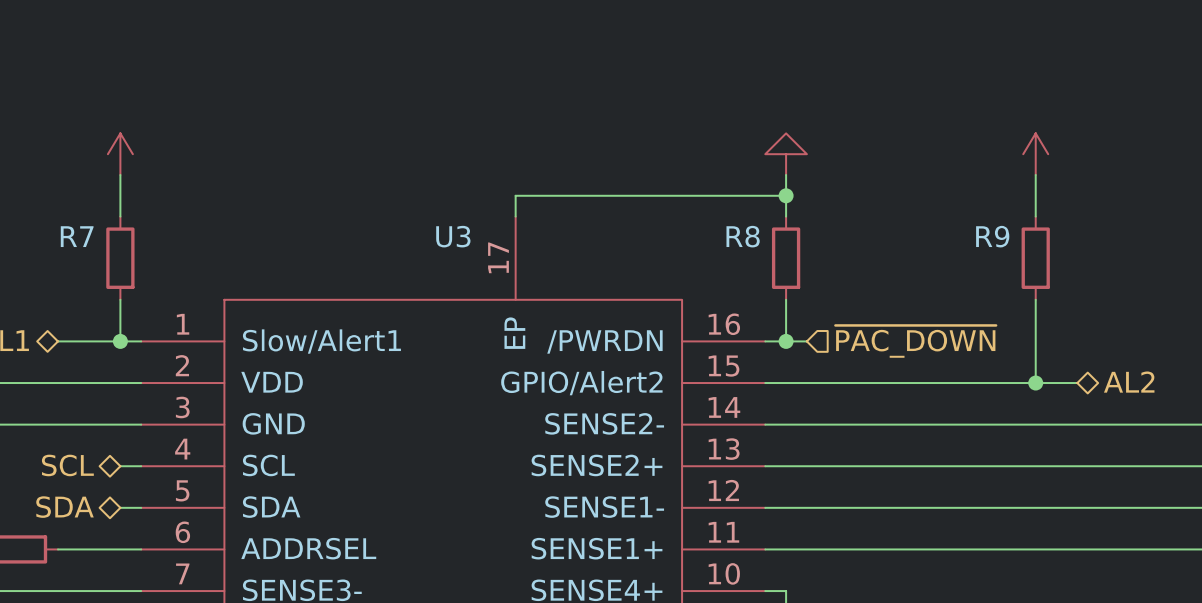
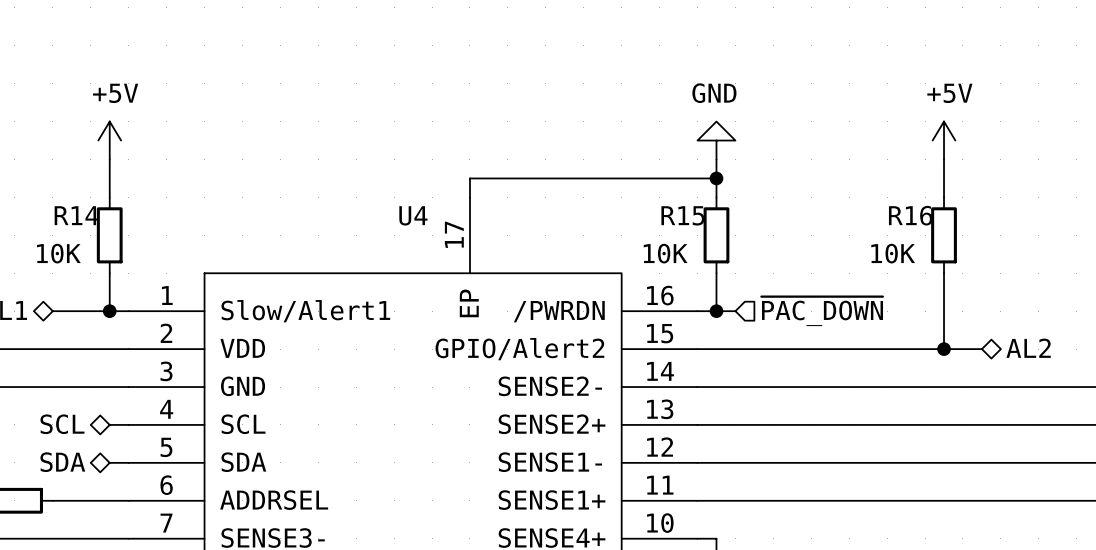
power symbol text: none -> +5V (115, 93)
power symbol text: none -> GND (714, 93)
power symbol text: none -> +5V (949, 93)
R7 name: R7 (77, 236) -> R14 (76, 215)
U3 name: U3 (453, 236) -> U4 (413, 215)
R8 name: R8 (743, 236) -> R15 (682, 215)
R9 name: R9 (992, 236) -> R16 (910, 215)
R7 value: none -> 10K (58, 253)
R8 value: none -> 10K (665, 253)
R9 value: none -> 10K (893, 253)

